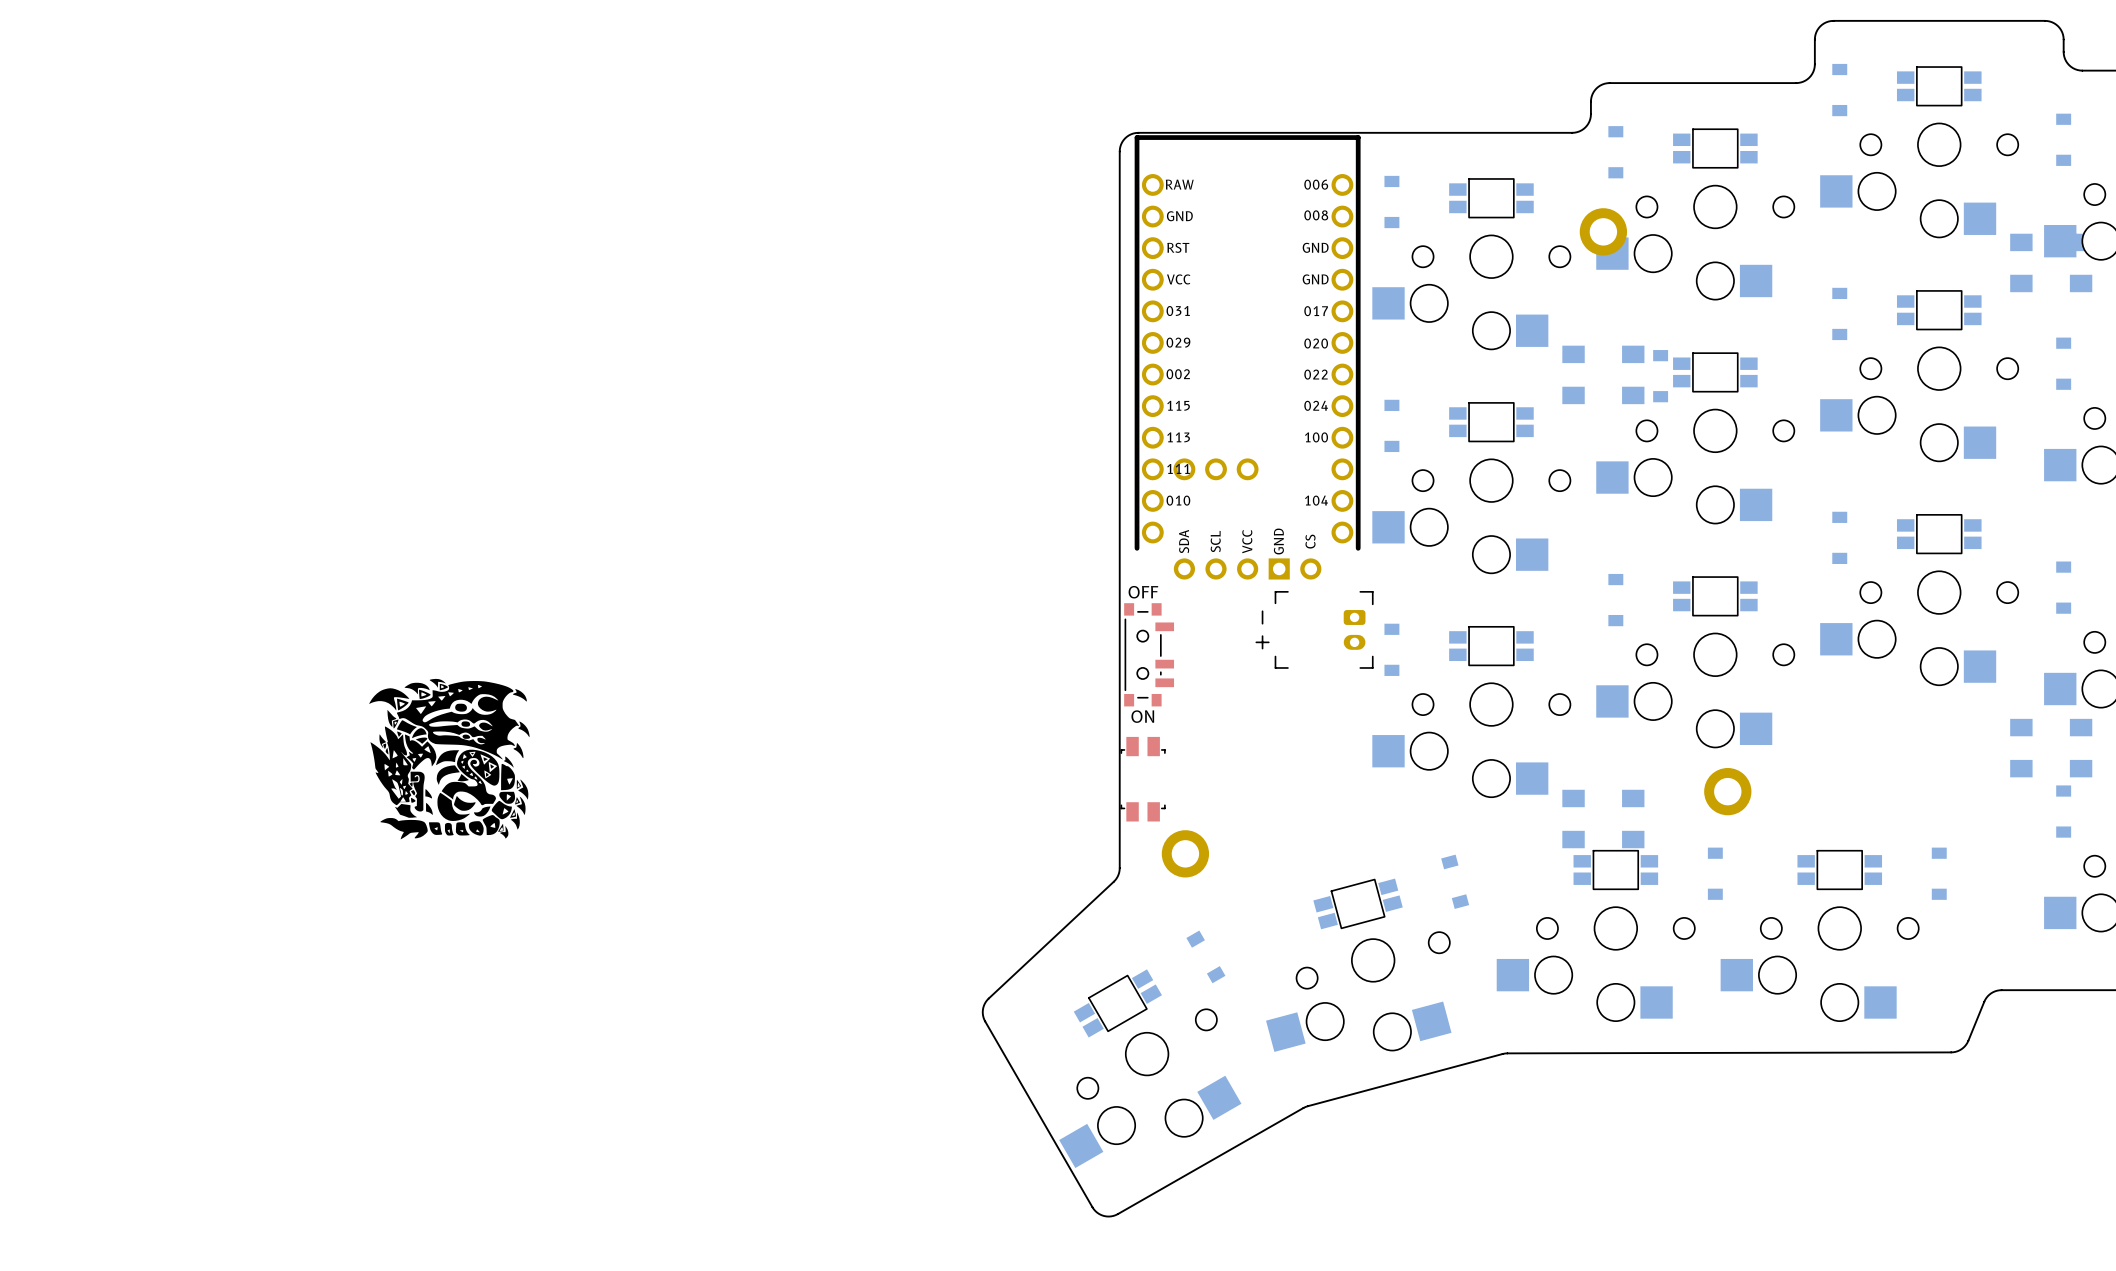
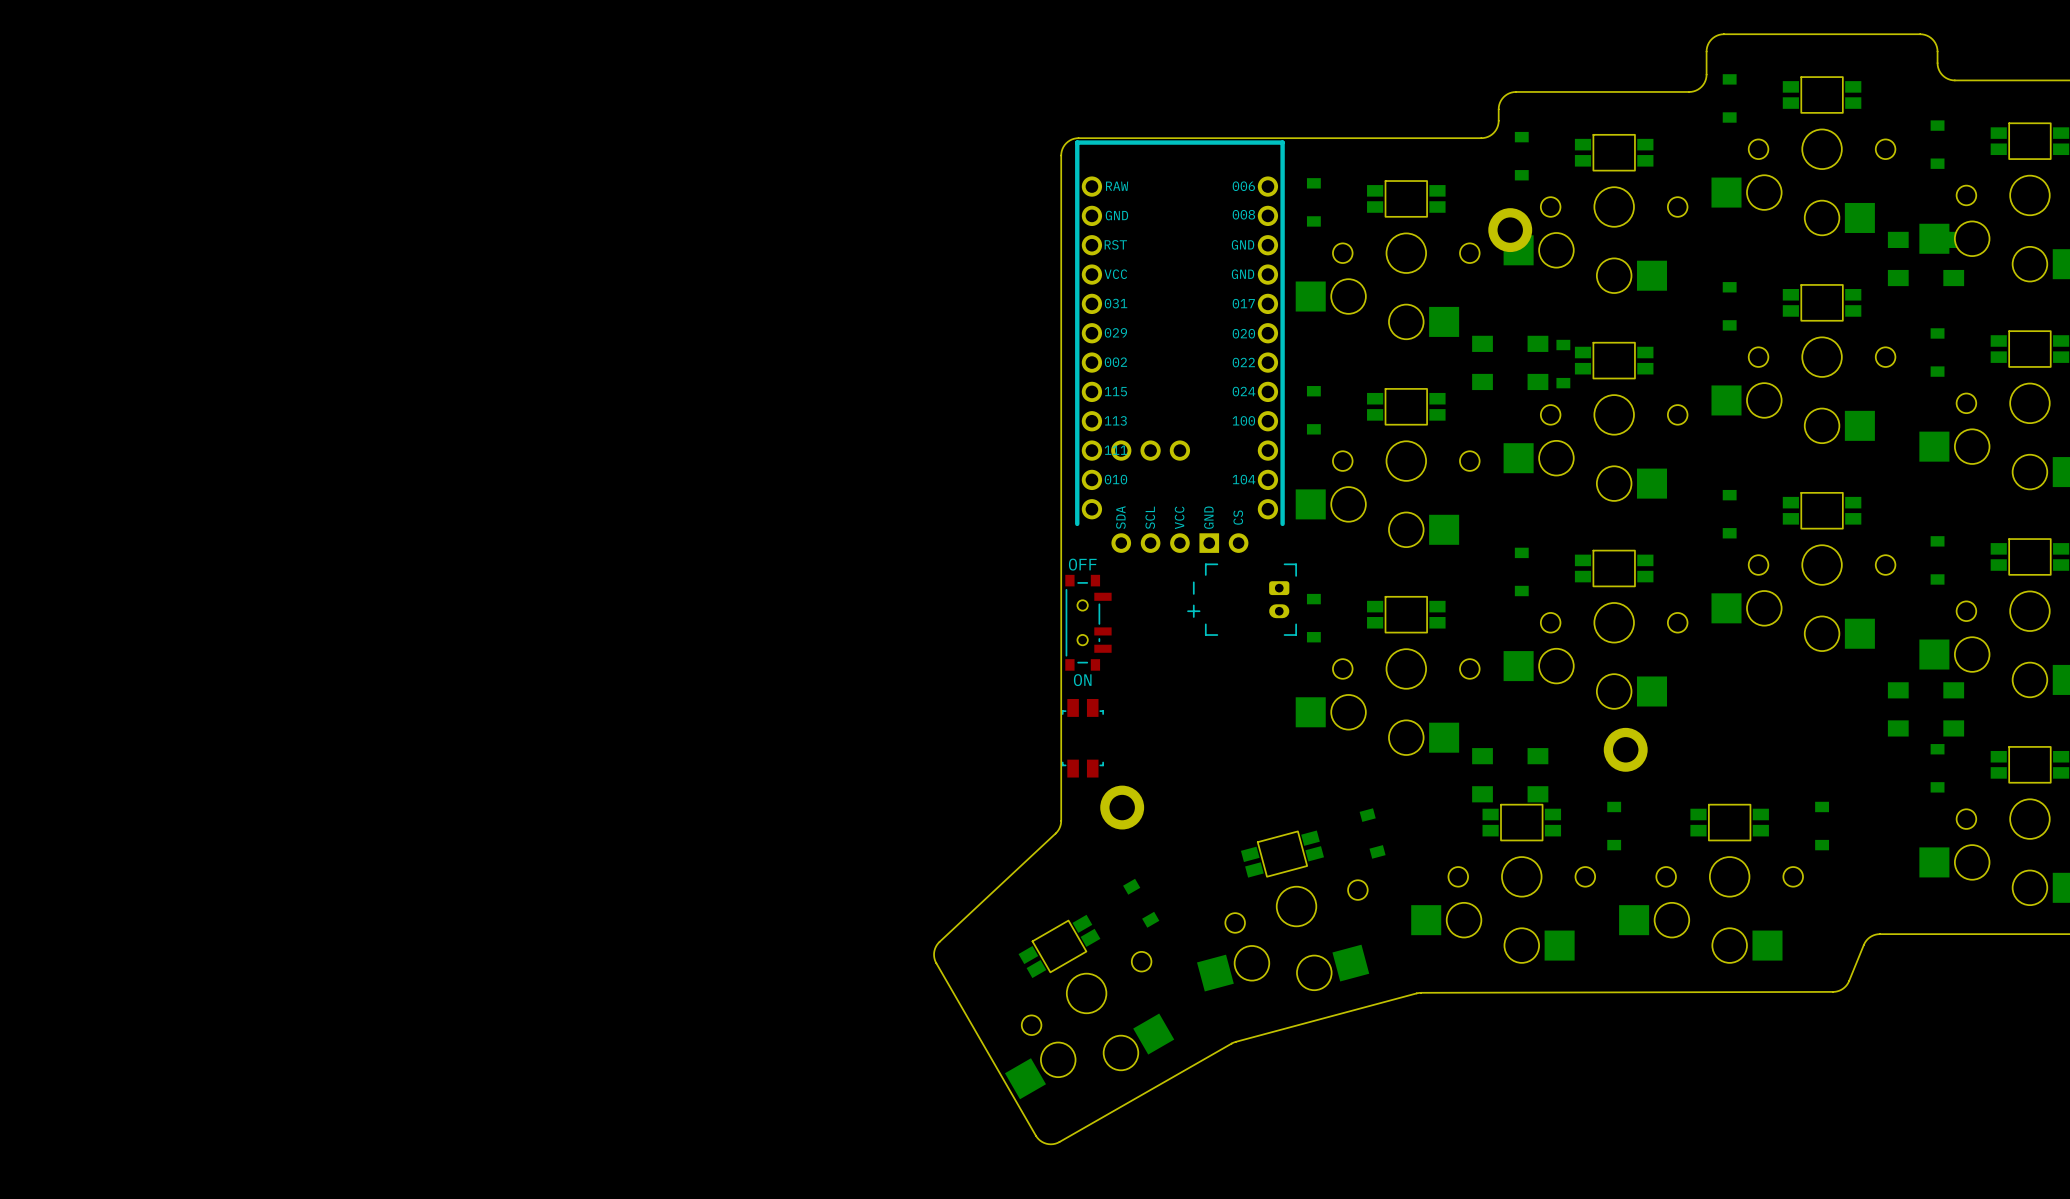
drawing: [369, 678, 530, 840] -> none

